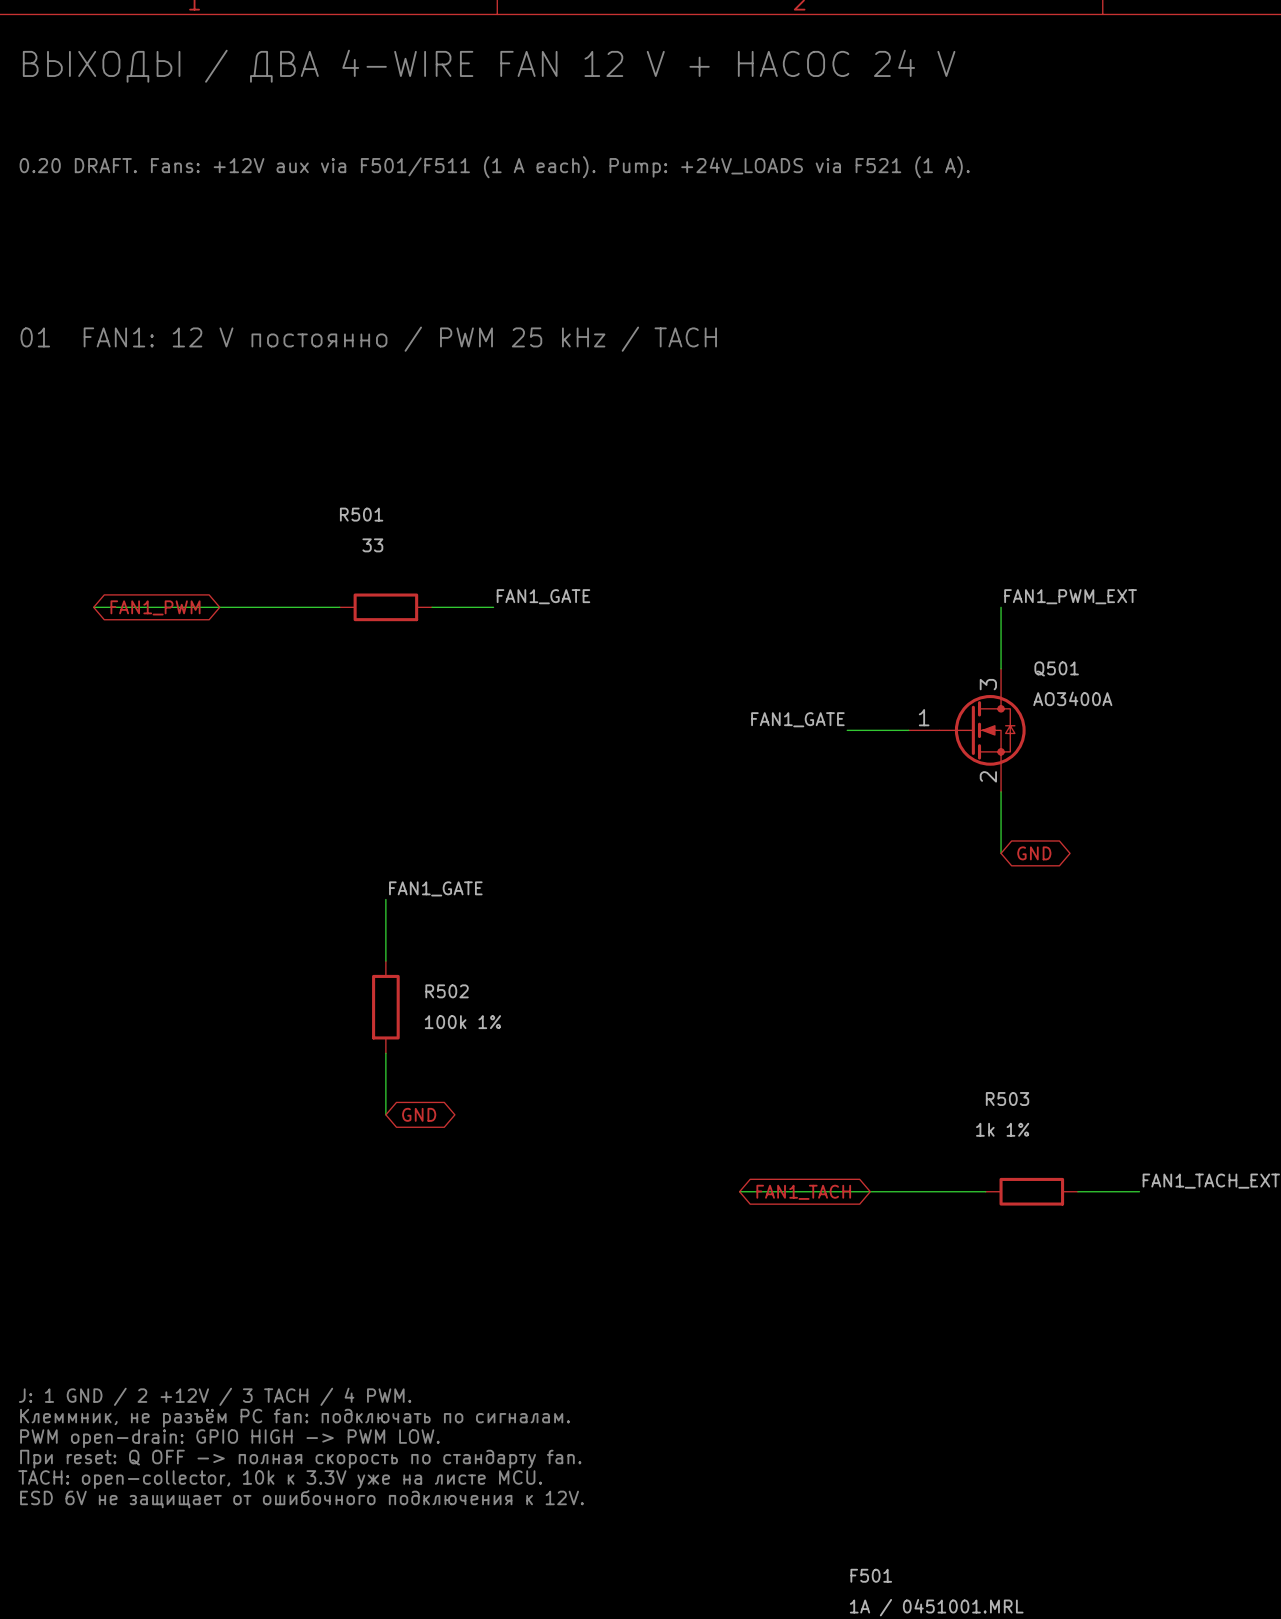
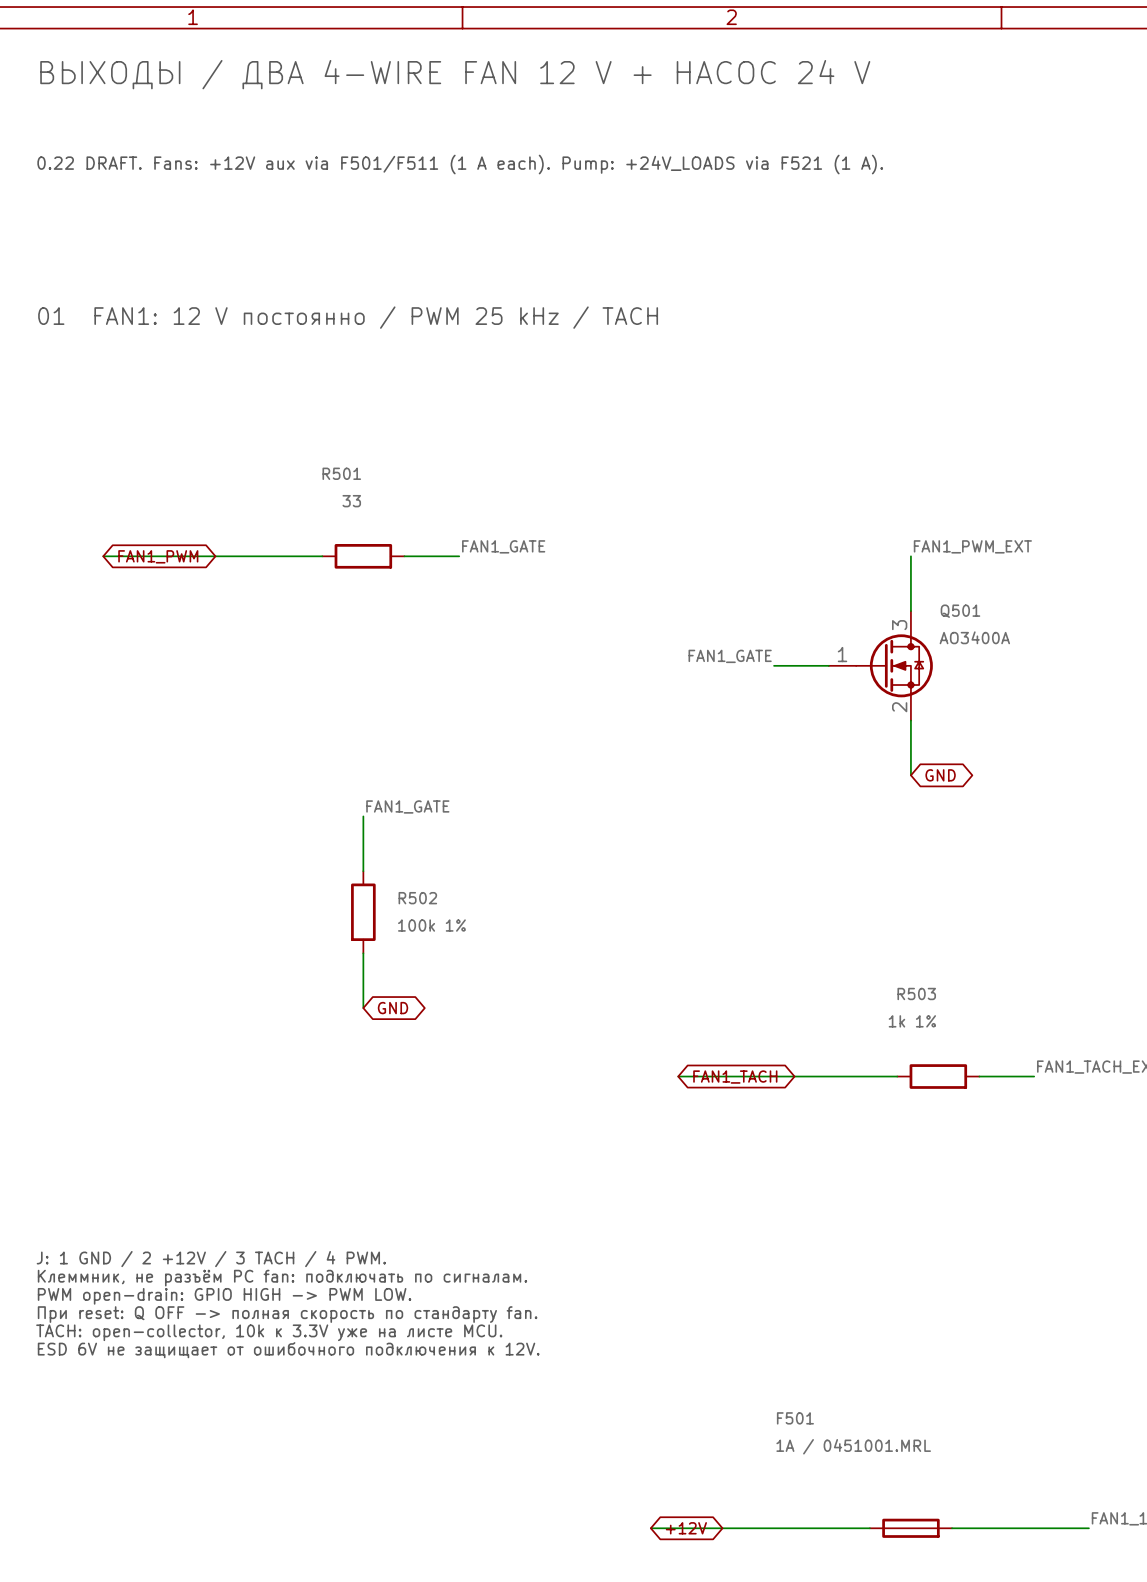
text: 0.20 DRAFT. Fans: +12V aux via F501/F511 (1 A each). Pump: +24V_LOADS via F521 (1 A). (494, 167) -> 0.22 DRAFT. Fans: +12V aux via F501/F511 (1 A each). Pump: +24V_LOADS via F521 (1 A). (460, 164)

